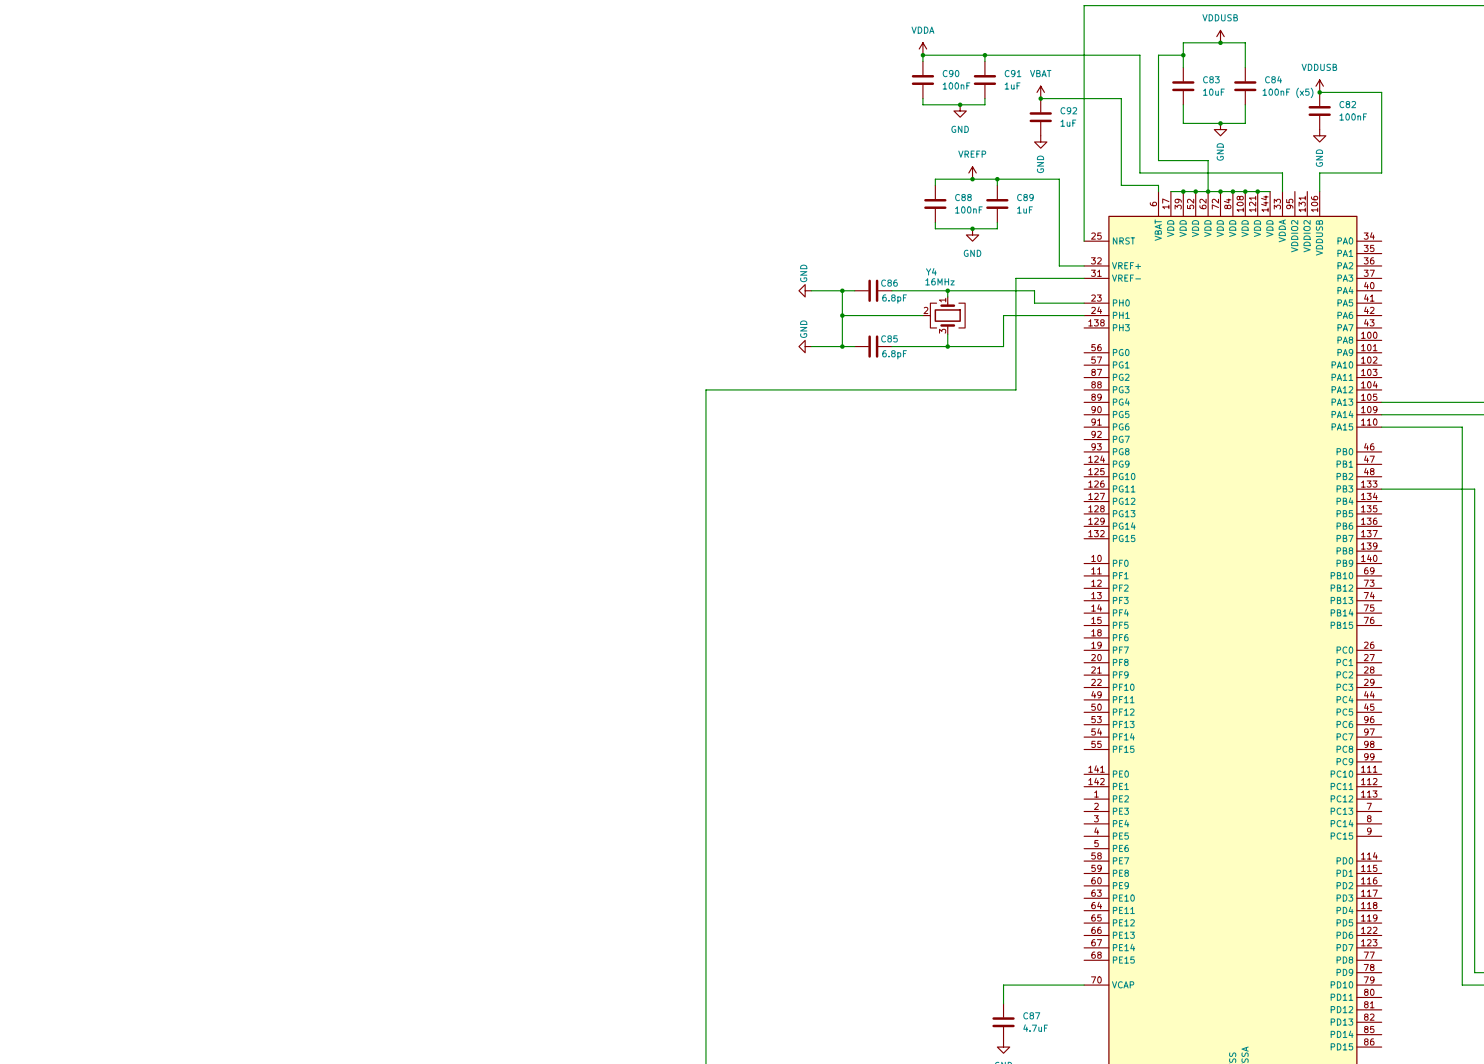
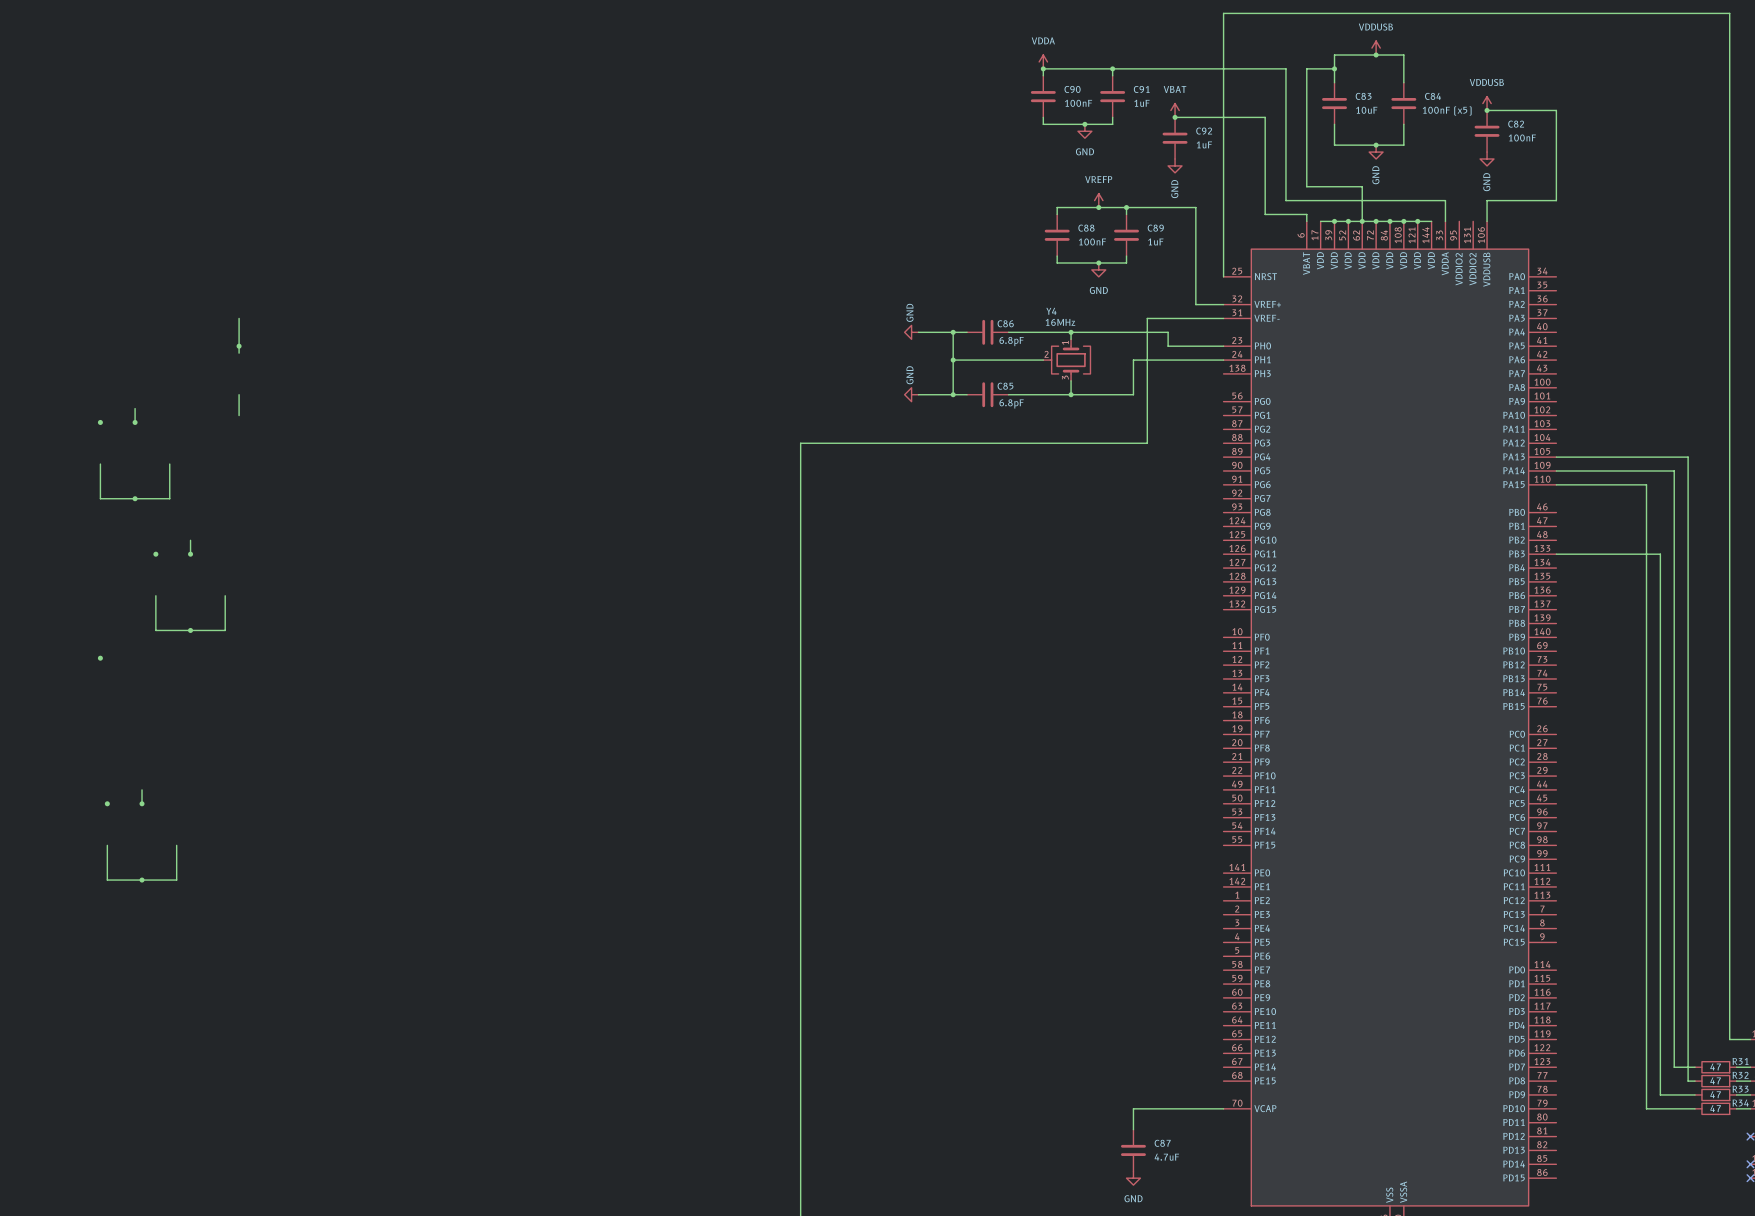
wire: none -> (239, 318) (239, 353)
junction: none -> (239, 346)
wire: none -> (239, 394) (239, 415)
wire: none -> (135, 408) (135, 422)
junction: none -> (100, 422)
junction: none -> (135, 422)
wire: none -> (100, 464) (100, 498) (169, 498) (169, 464)
junction: none -> (135, 498)
wire: none -> (190, 540) (190, 554)
junction: none -> (155, 554)
junction: none -> (190, 554)
wire: none -> (155, 595) (155, 630) (225, 630) (225, 595)
junction: none -> (190, 630)
junction: none -> (100, 658)
wire: none -> (142, 789) (142, 803)
junction: none -> (107, 803)
junction: none -> (142, 803)
wire: none -> (107, 845) (107, 880) (176, 880) (176, 845)
junction: none -> (142, 880)

